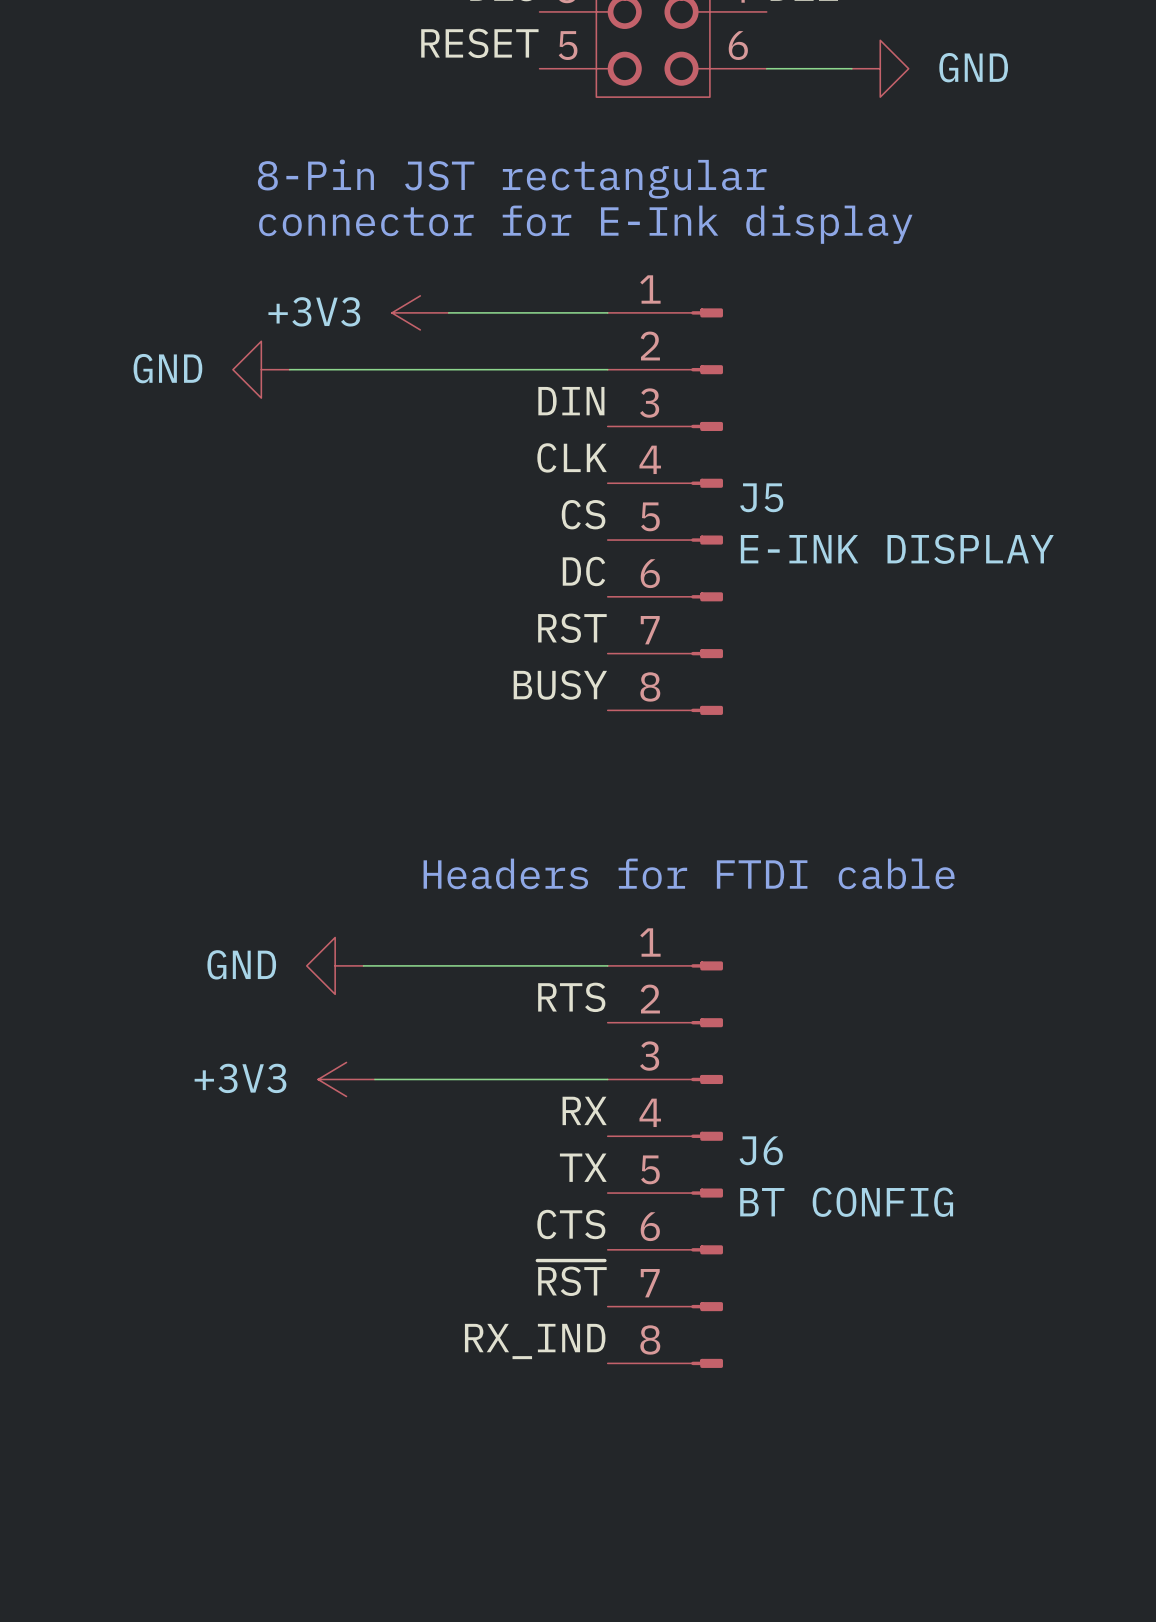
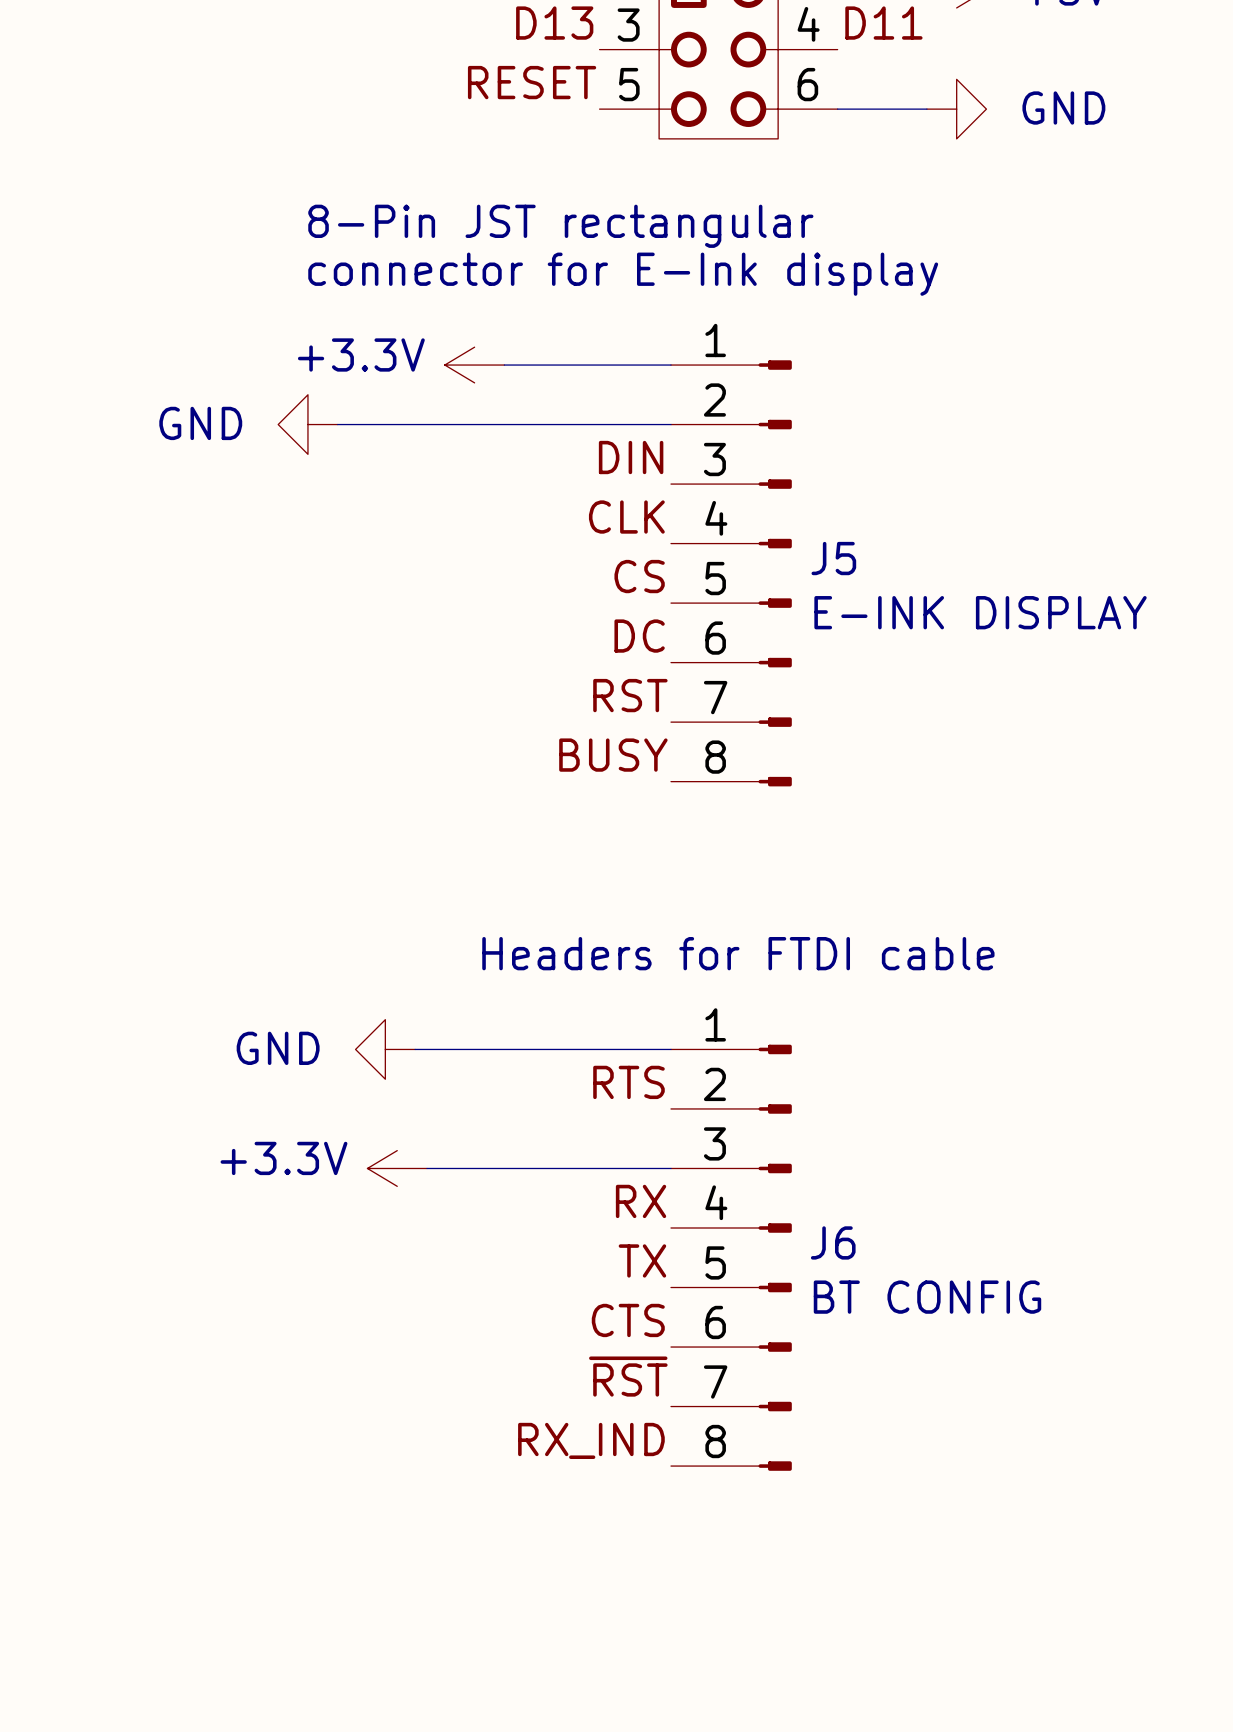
power symbol: +3V3 (420, 312) -> +3.3V (474, 365)
power symbol: +3V3 (346, 1079) -> +3.3V (397, 1168)

